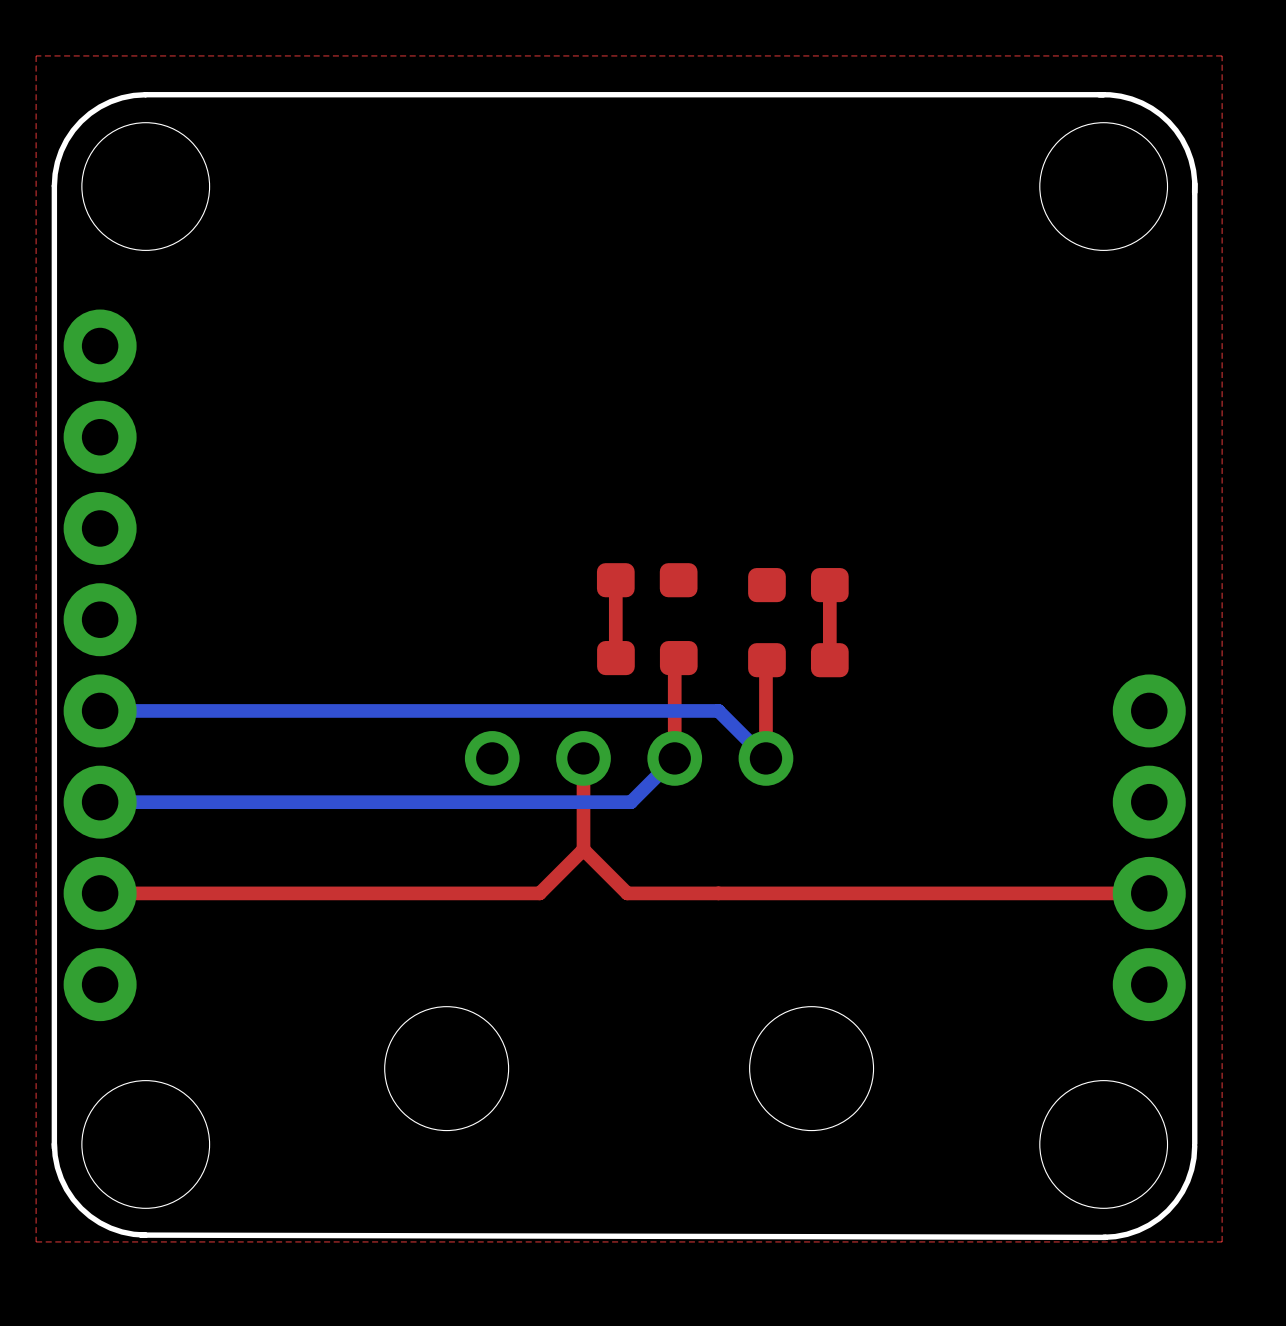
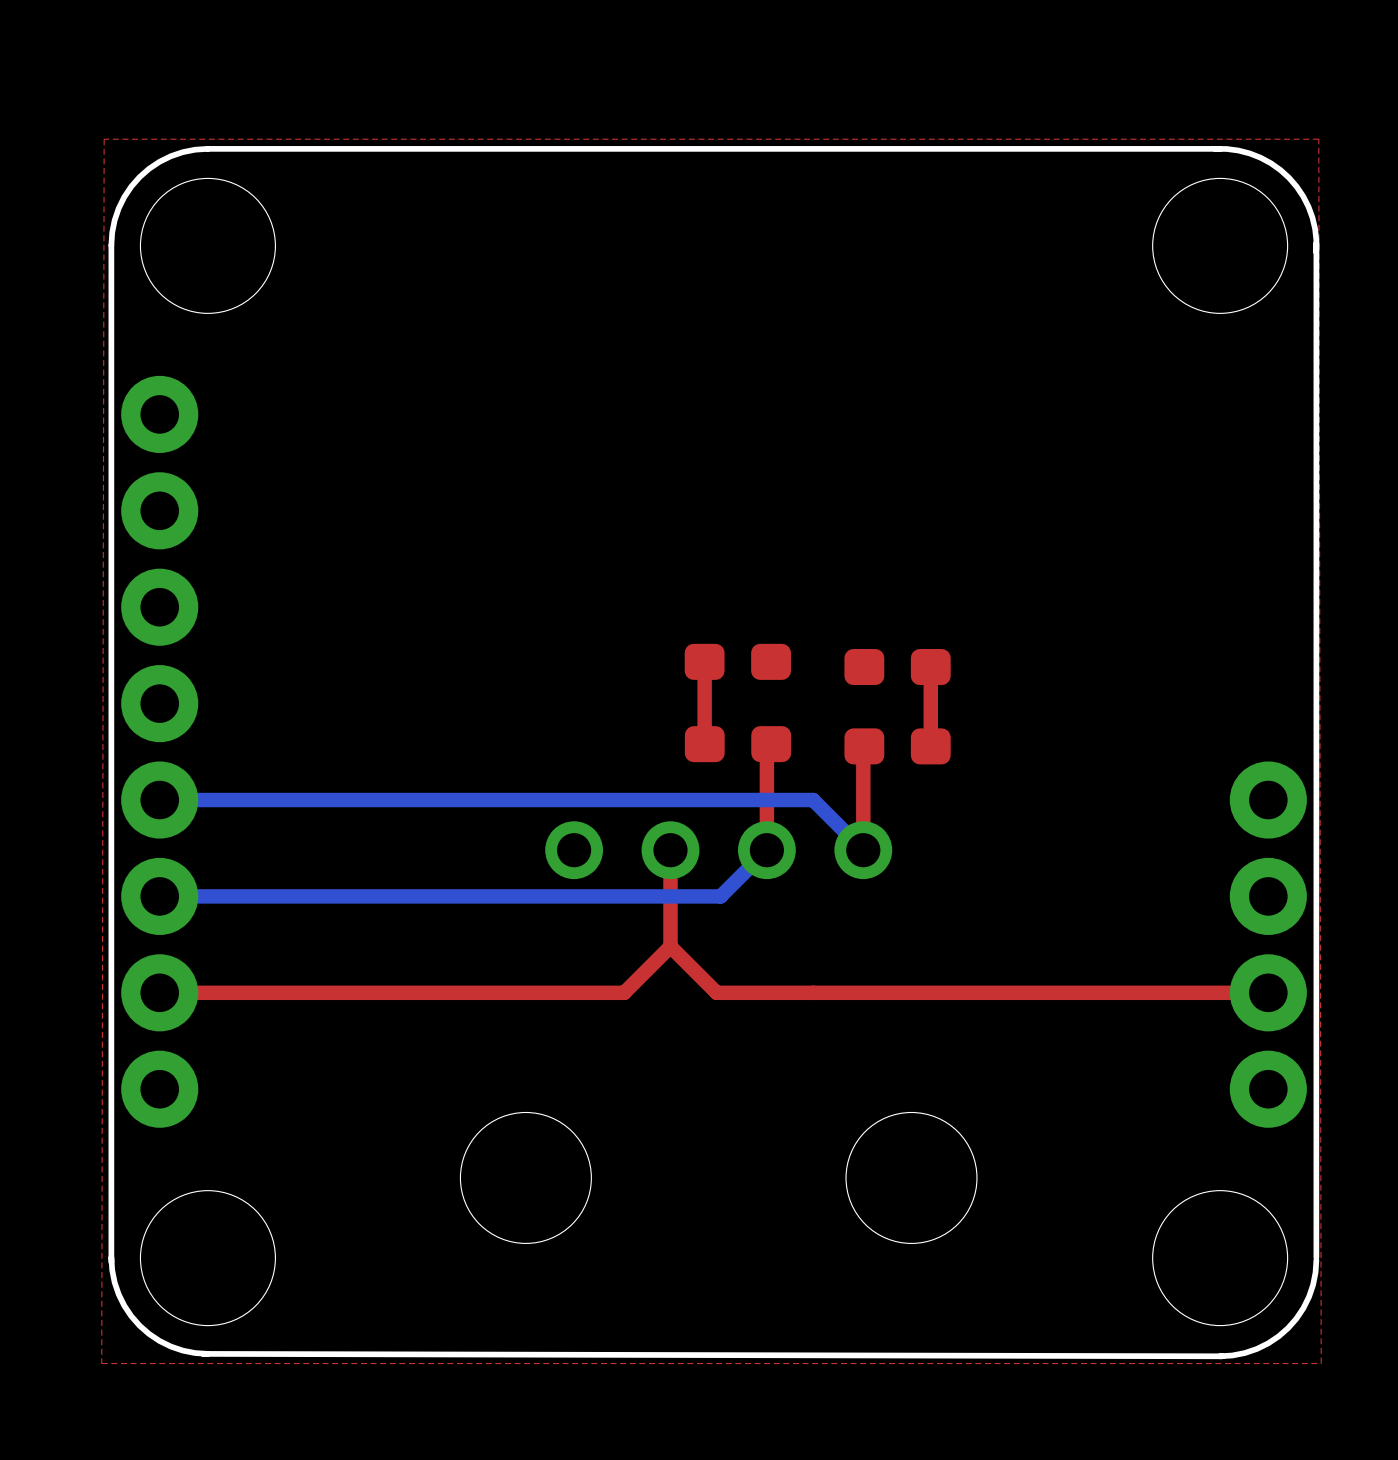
top zone outline: (1222, 55) (36, 55) (36, 1241) (1222, 1241) (1222, 55) -> (1318, 139) (1321, 1363) (101, 1363) (104, 139) (1318, 139)

